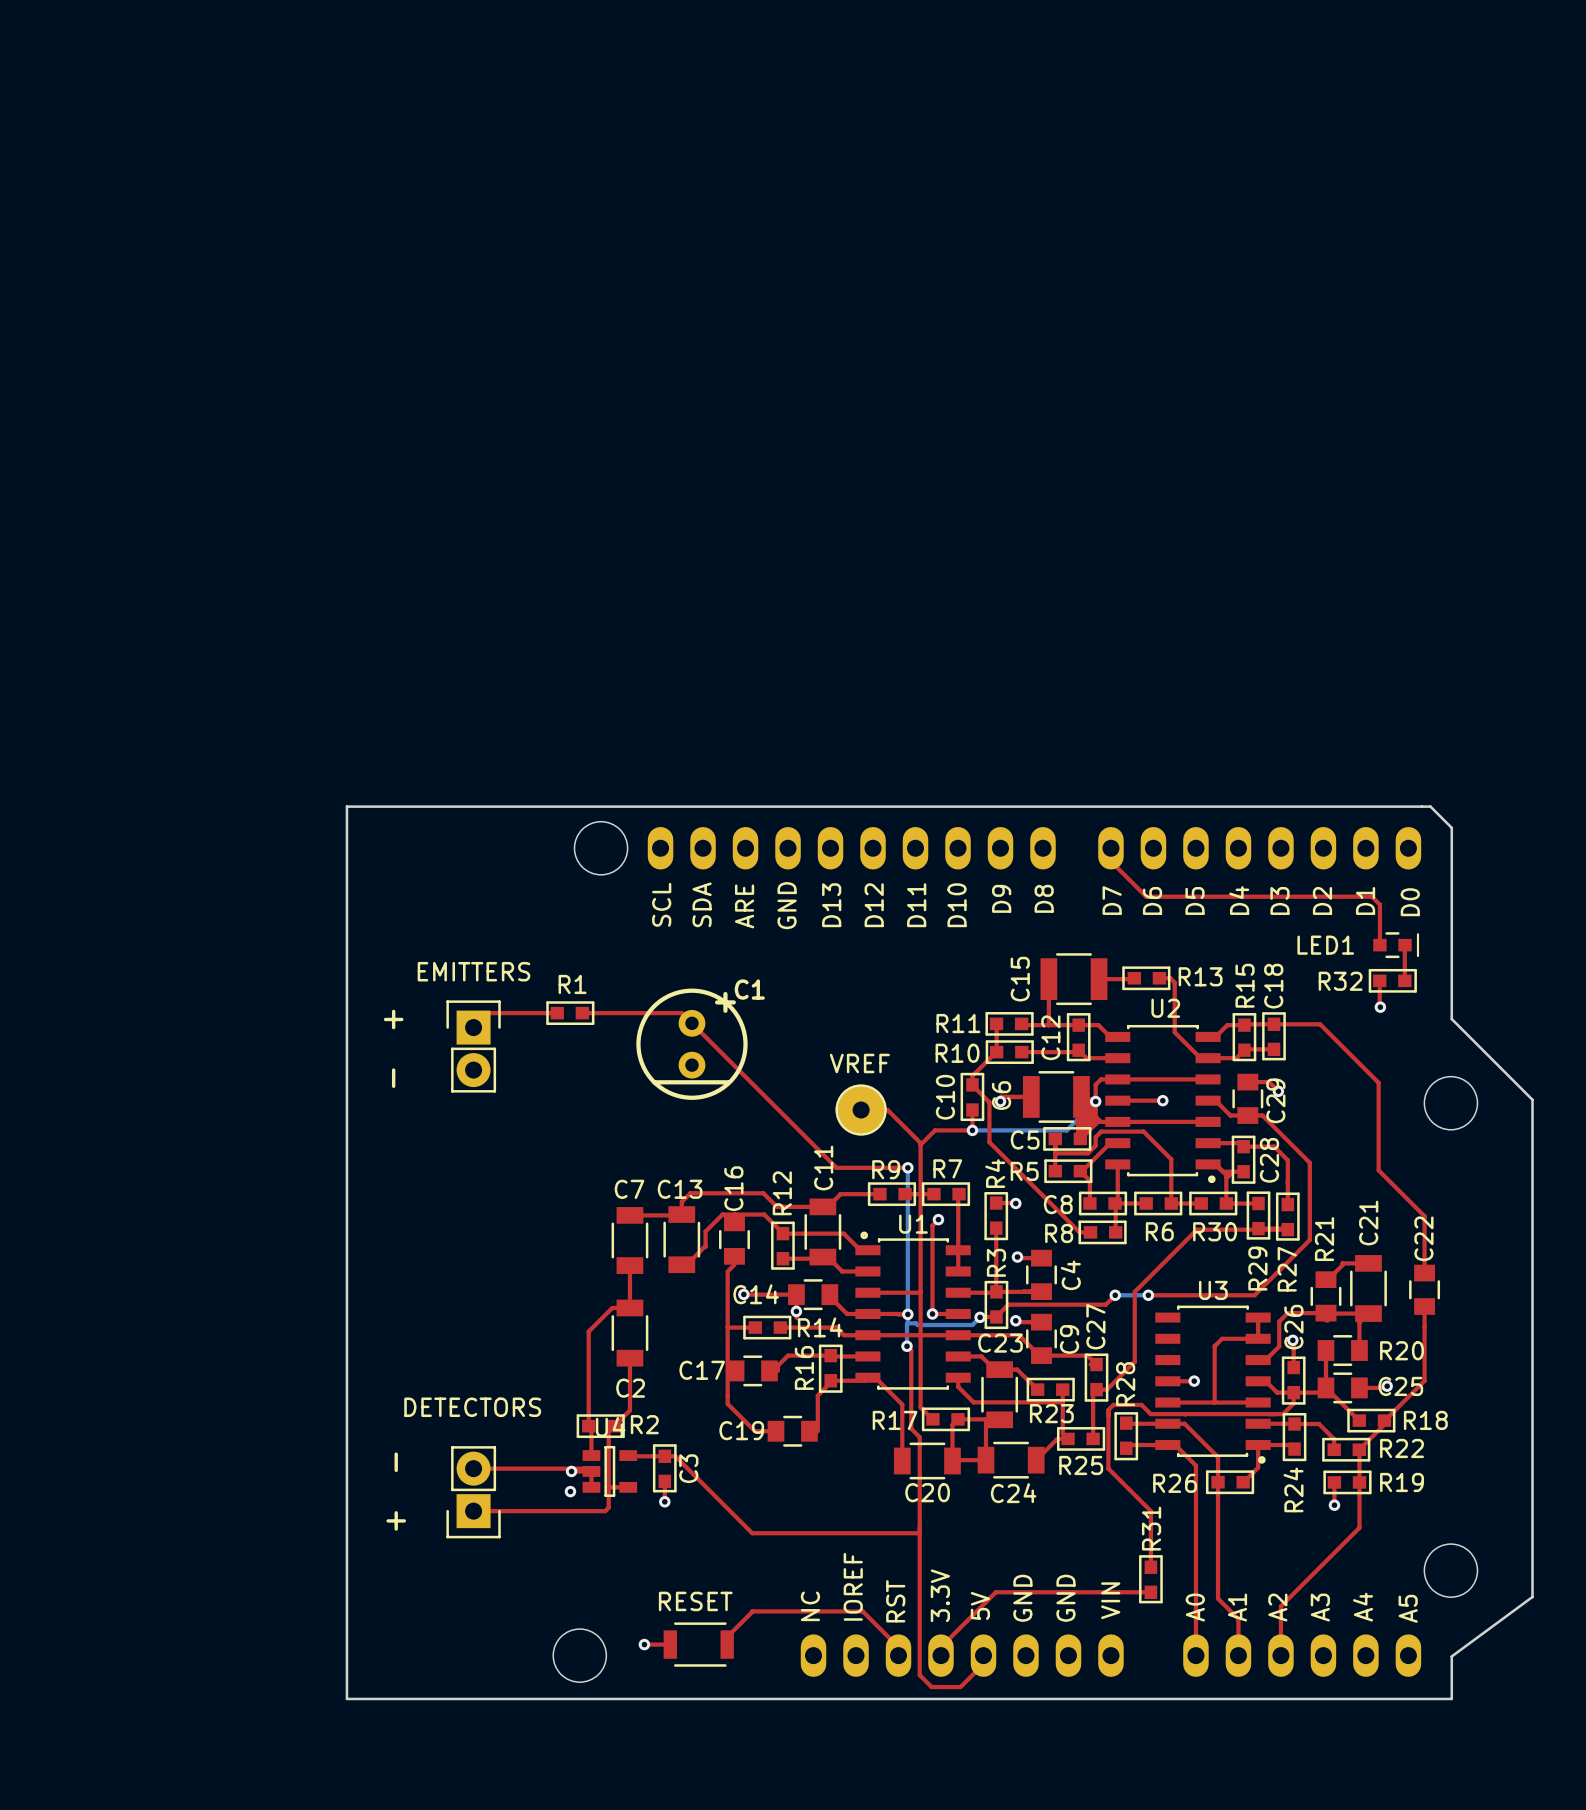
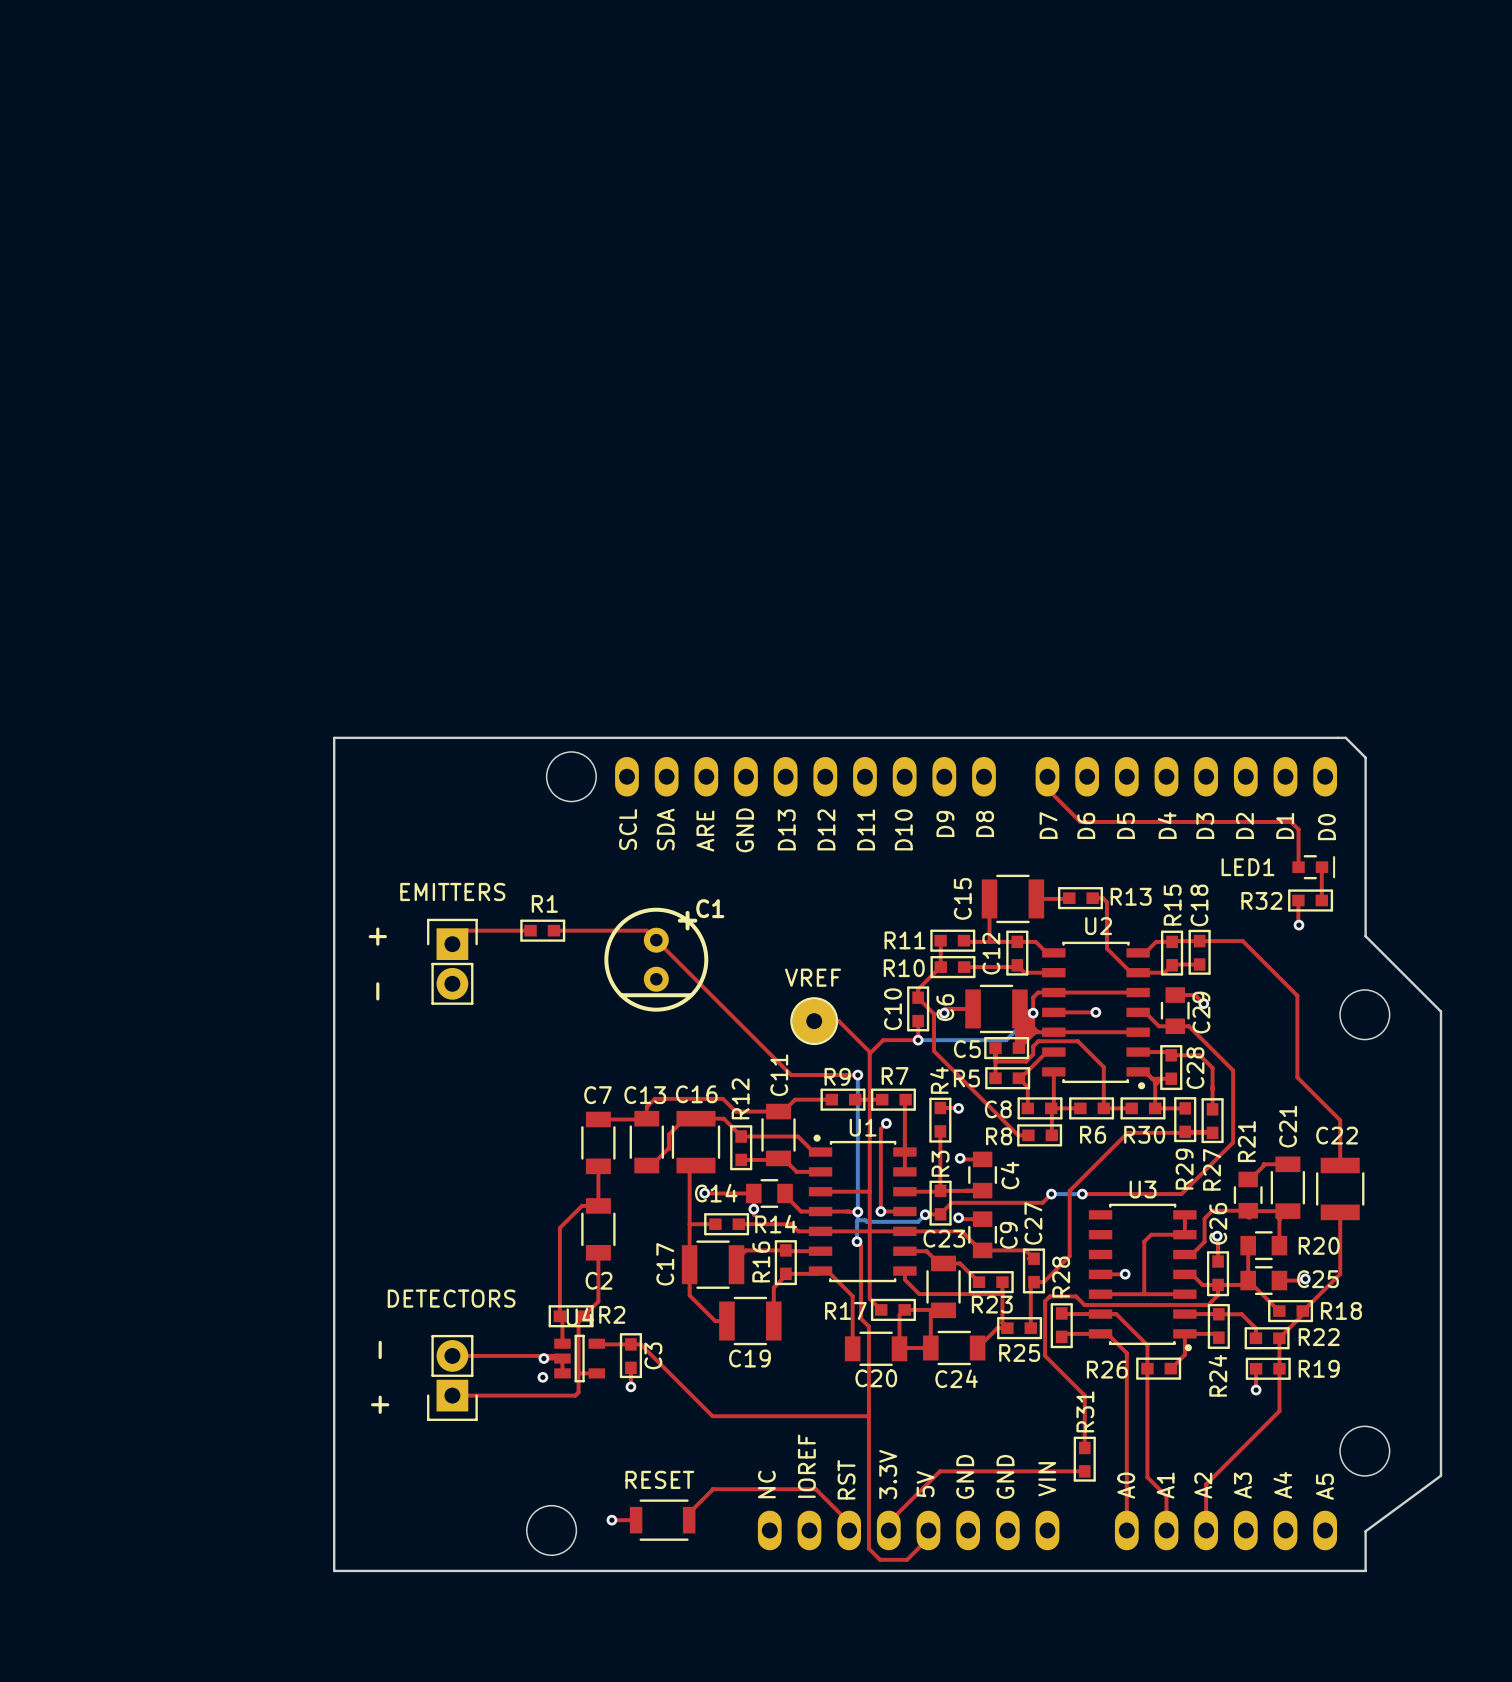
C16 name rotation: 0° (733, 1188) -> 90° clockwise (696, 1094)
C16 footprint: [719, 1214, 750, 1265] -> [671, 1110, 721, 1174]
C22 name rotation: 0° (1423, 1238) -> 90° clockwise (1337, 1135)
C22 footprint: [1409, 1264, 1441, 1315] -> [1316, 1157, 1365, 1221]
C17 footprint: [727, 1355, 778, 1387] -> [681, 1240, 745, 1289]
C17 name rotation: 0° (702, 1370) -> 90° counterclockwise (665, 1264)
C19 footprint: [767, 1415, 818, 1447] -> [719, 1296, 782, 1346]
C19 name position: C19 (741, 1430) -> C19 (749, 1358)

